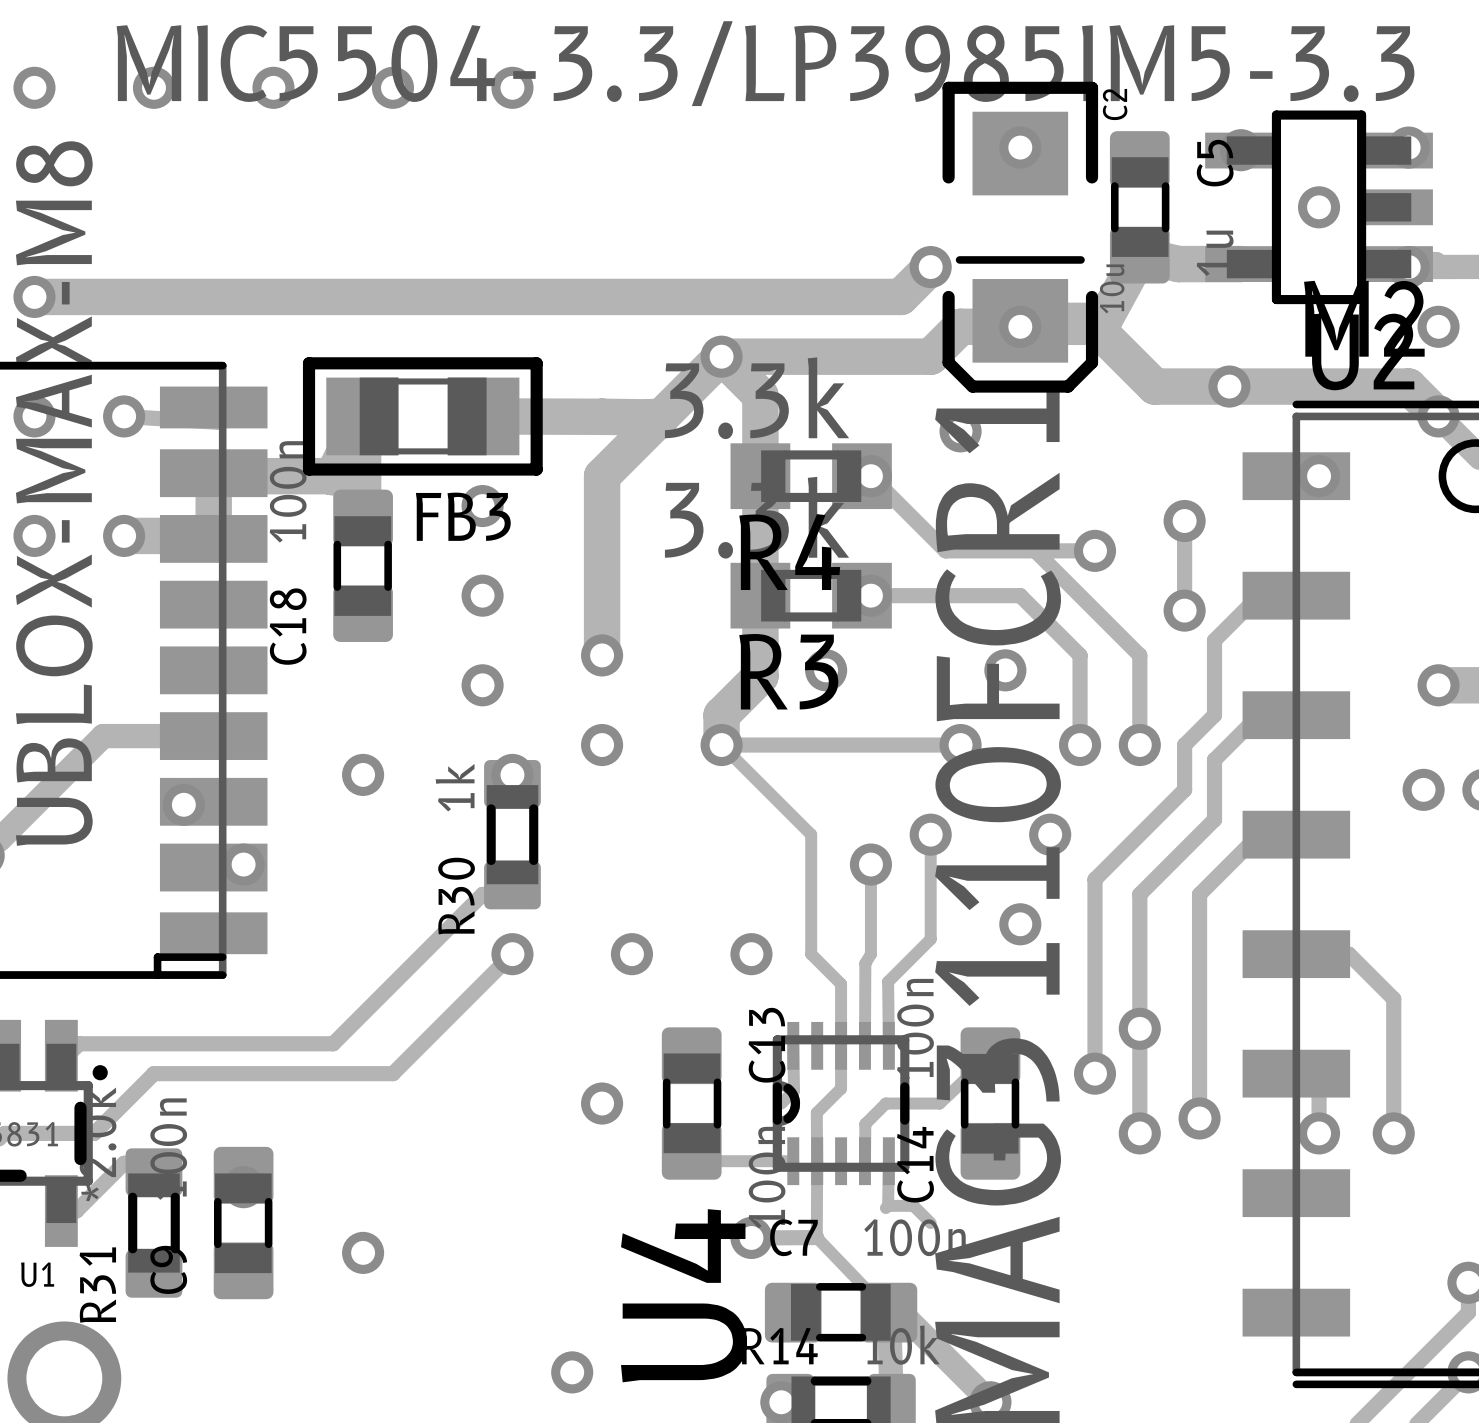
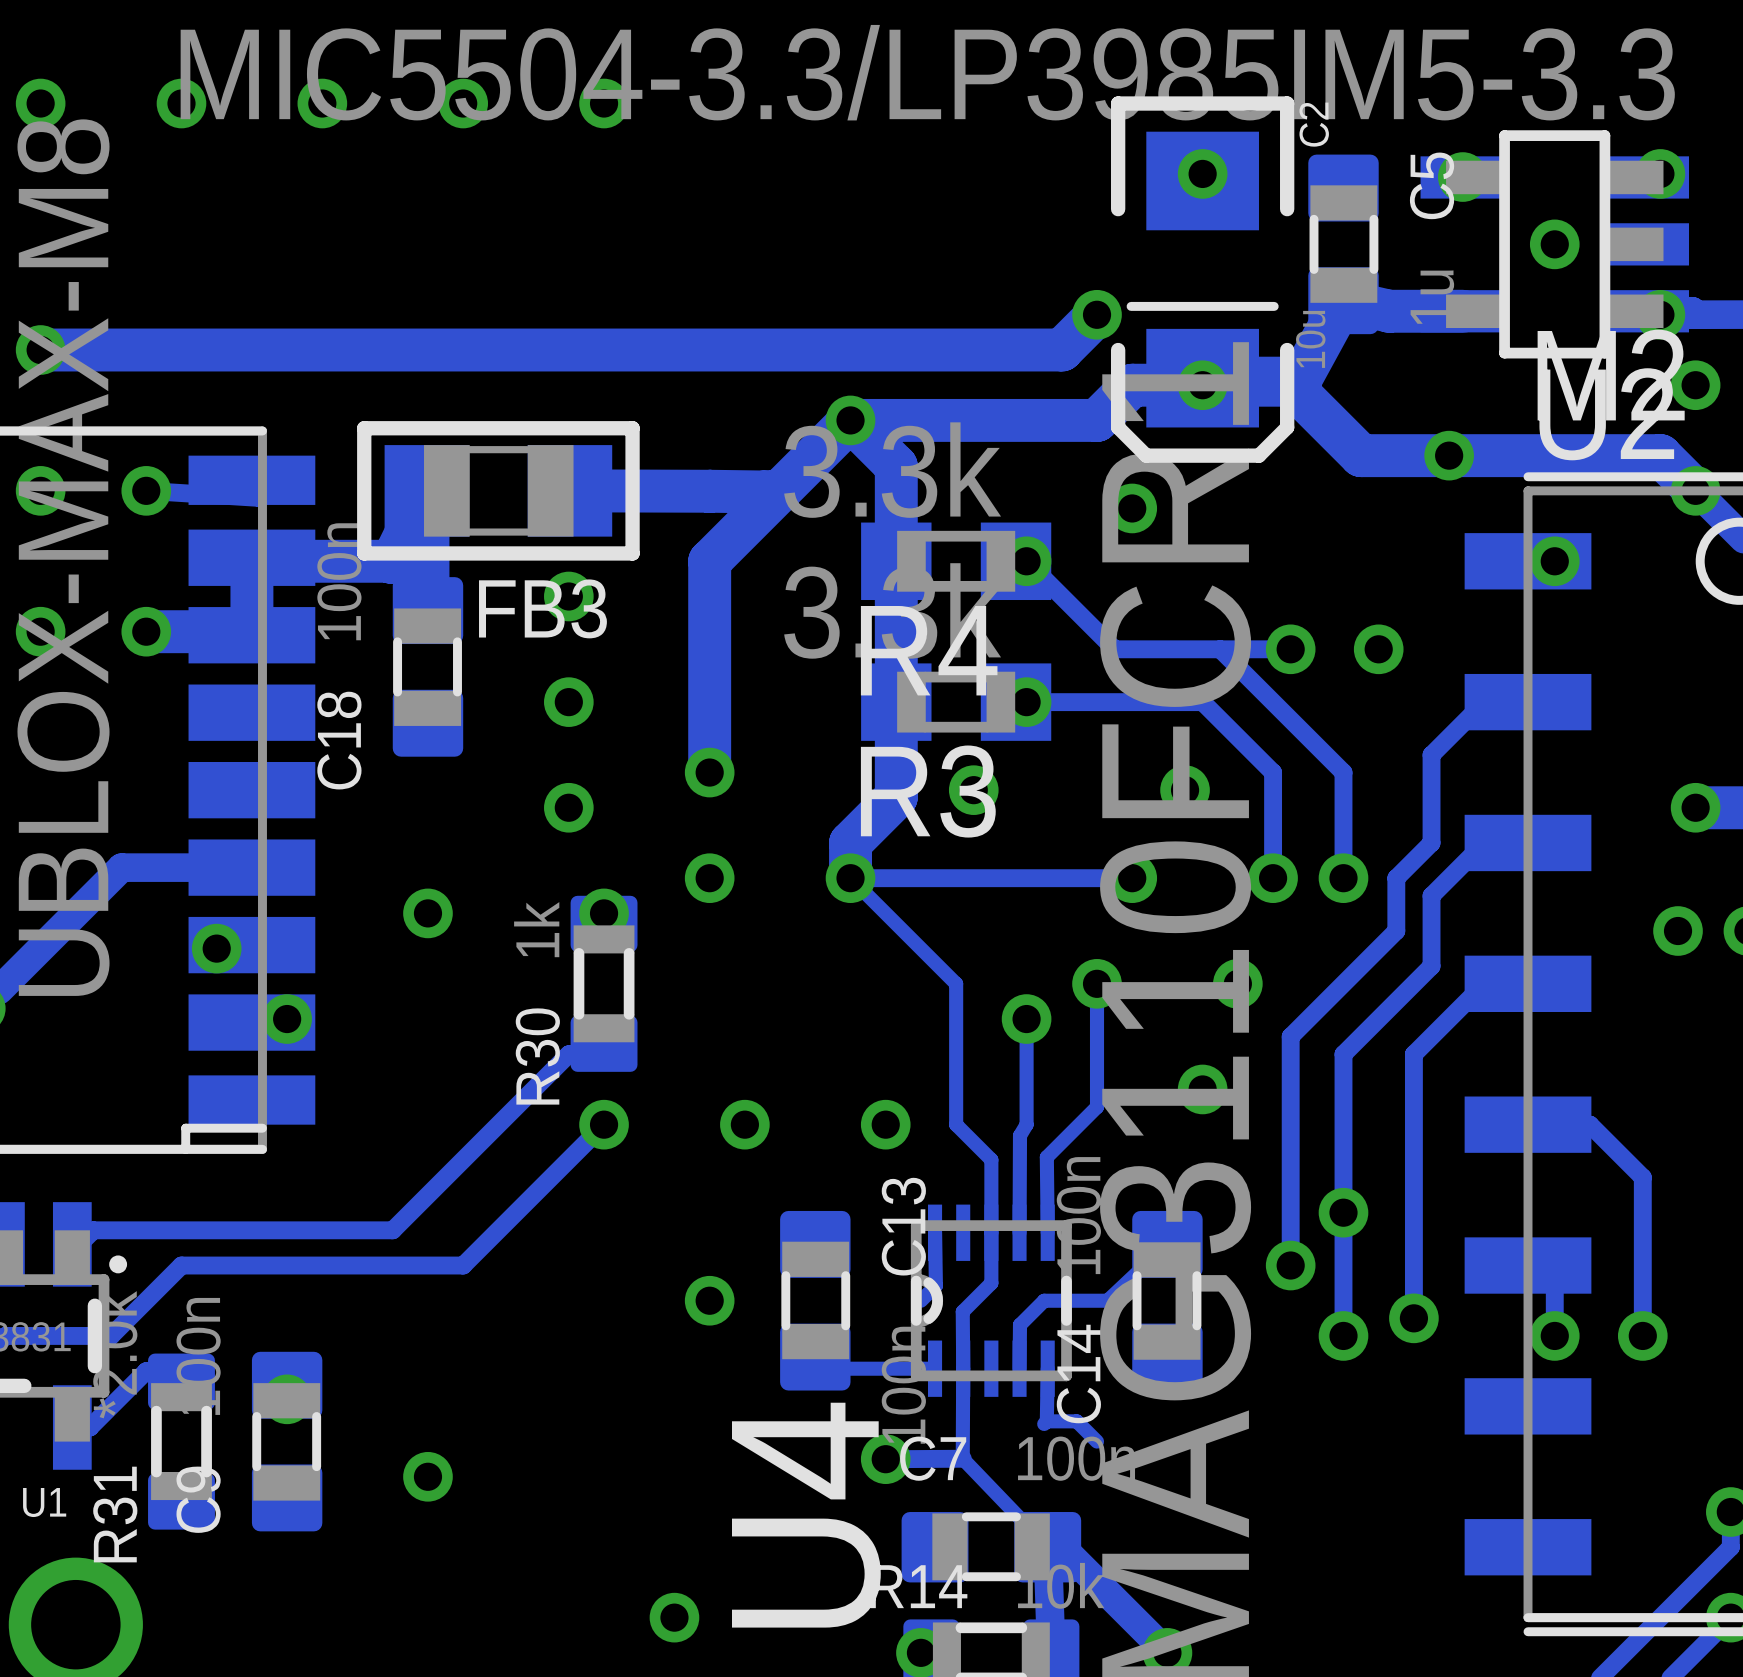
track: (1184, 520) (1184, 610) -> none
via position: (1184, 520) -> (1378, 649)
via: (1184, 610) -> none

